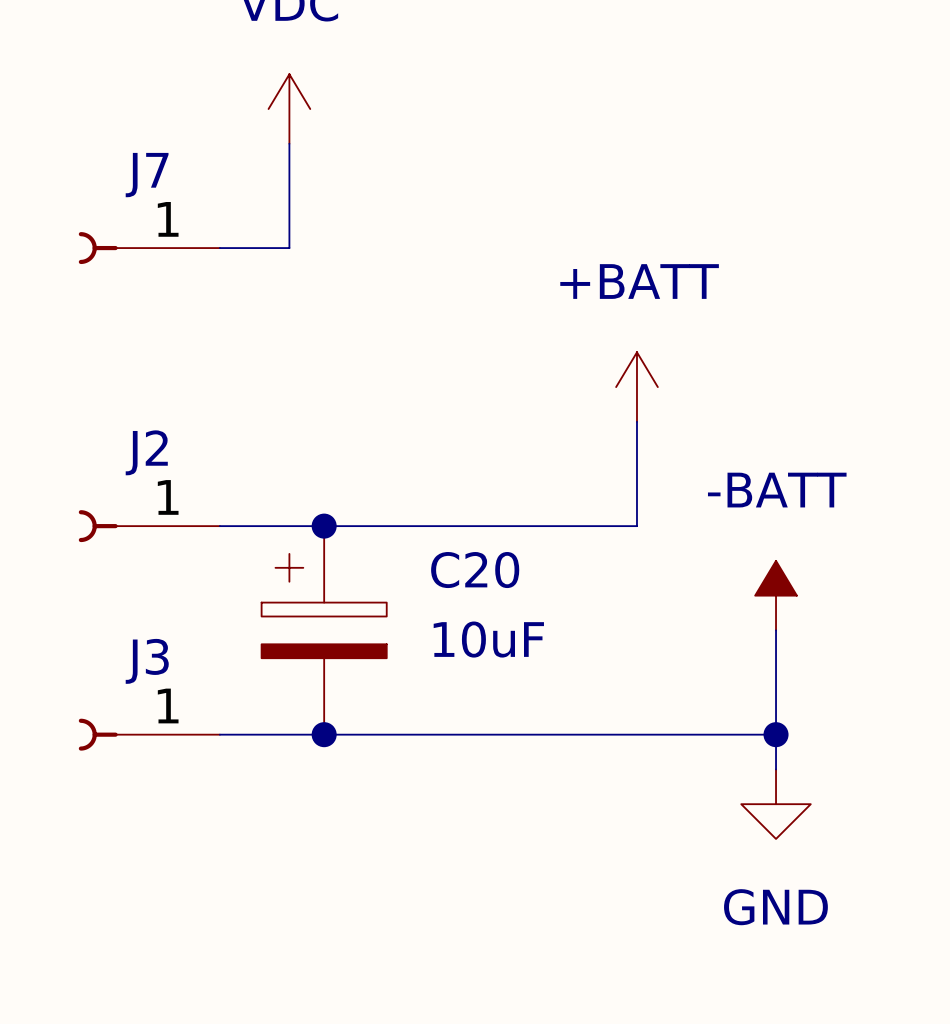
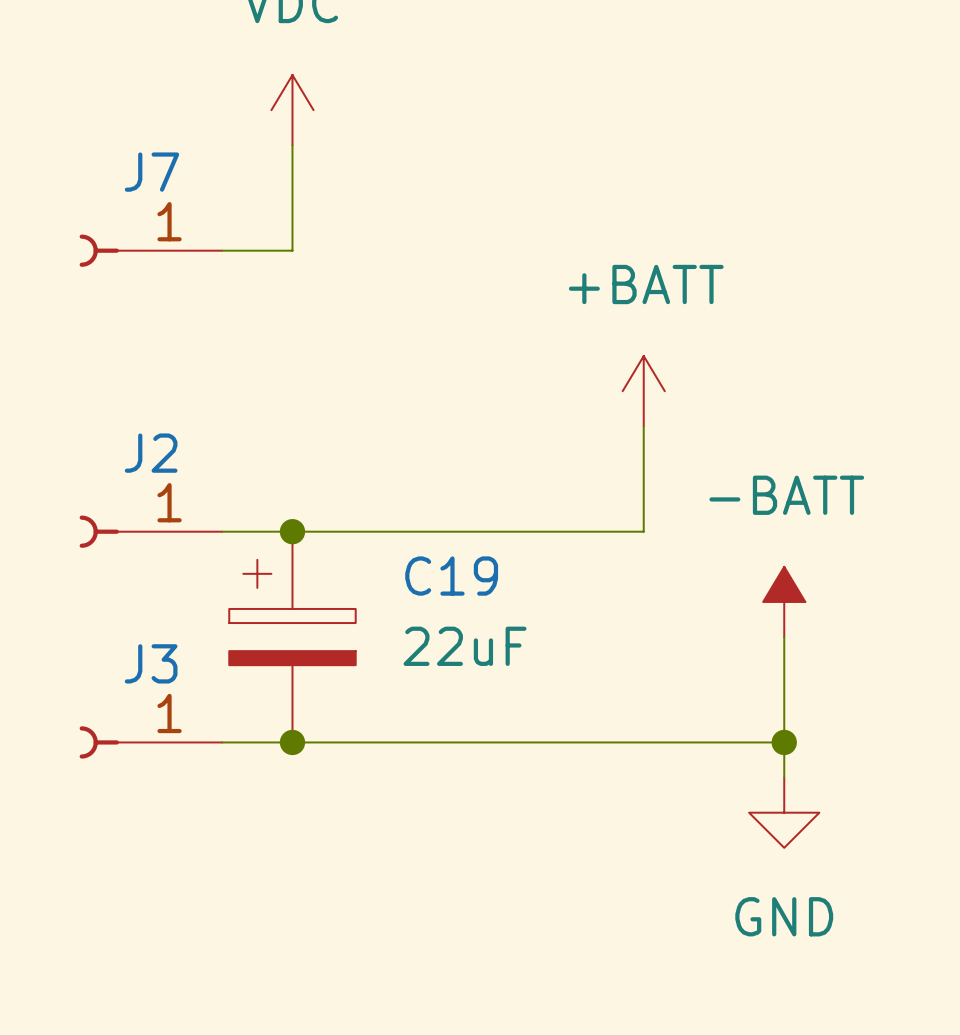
junction position: (324, 526) -> (292, 531)
C19: none -> 22uF (292, 637)
C20: 10uF (324, 630) -> none
junction position: (324, 734) -> (292, 742)

